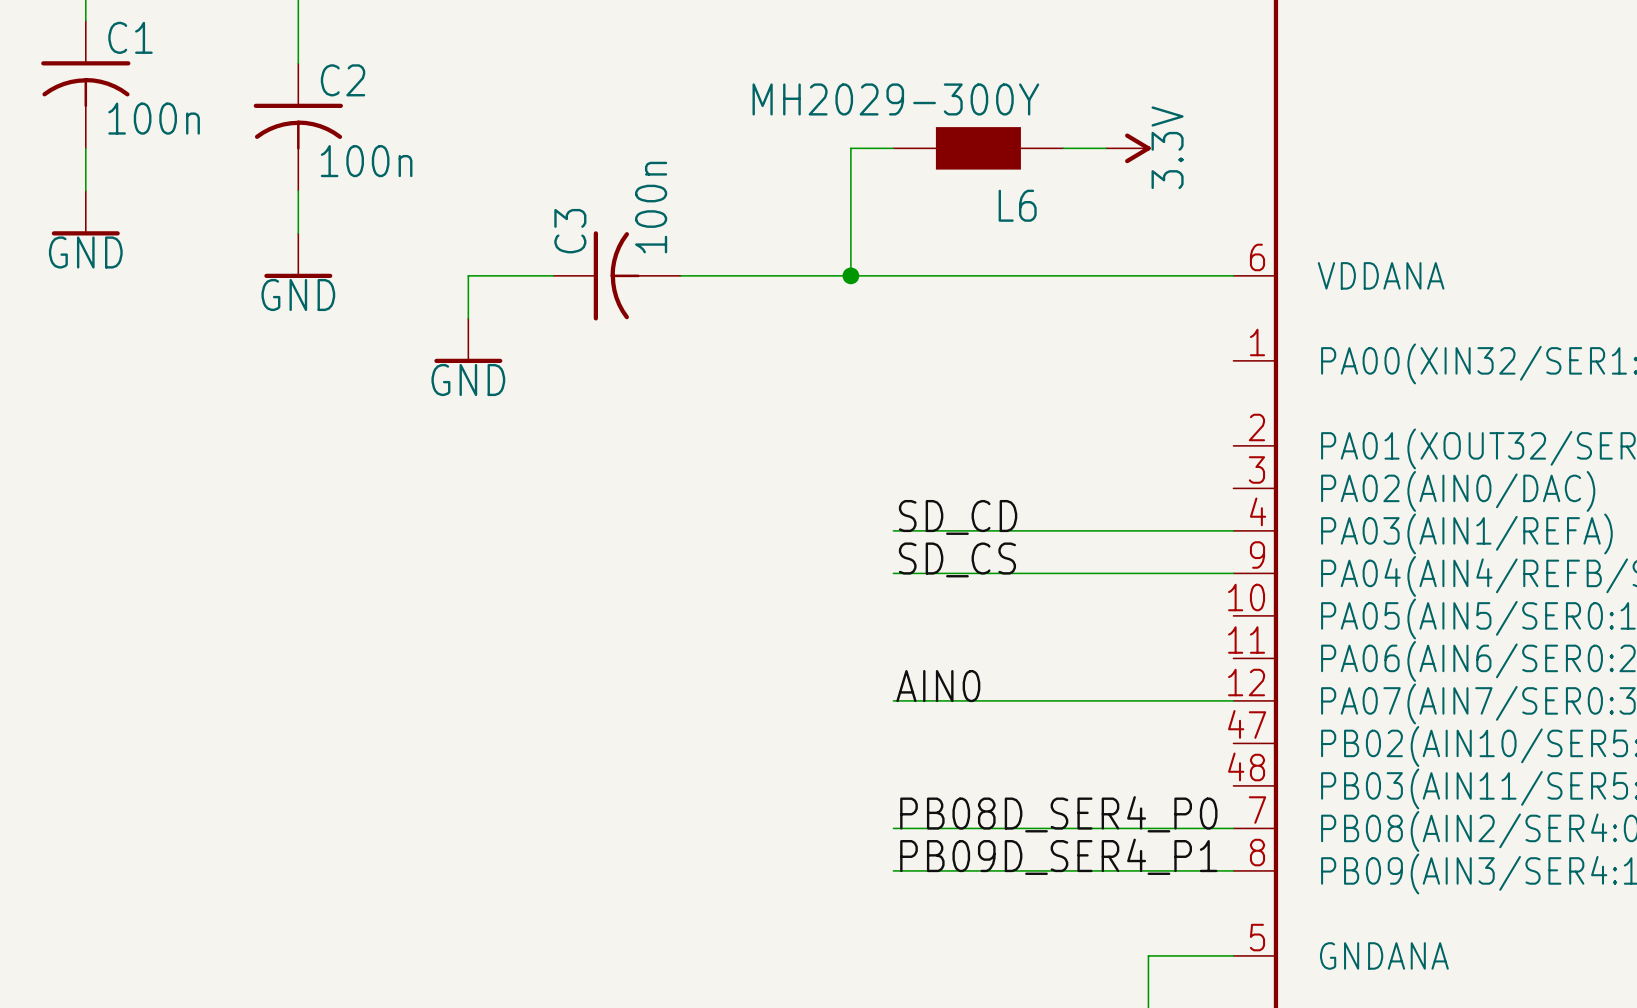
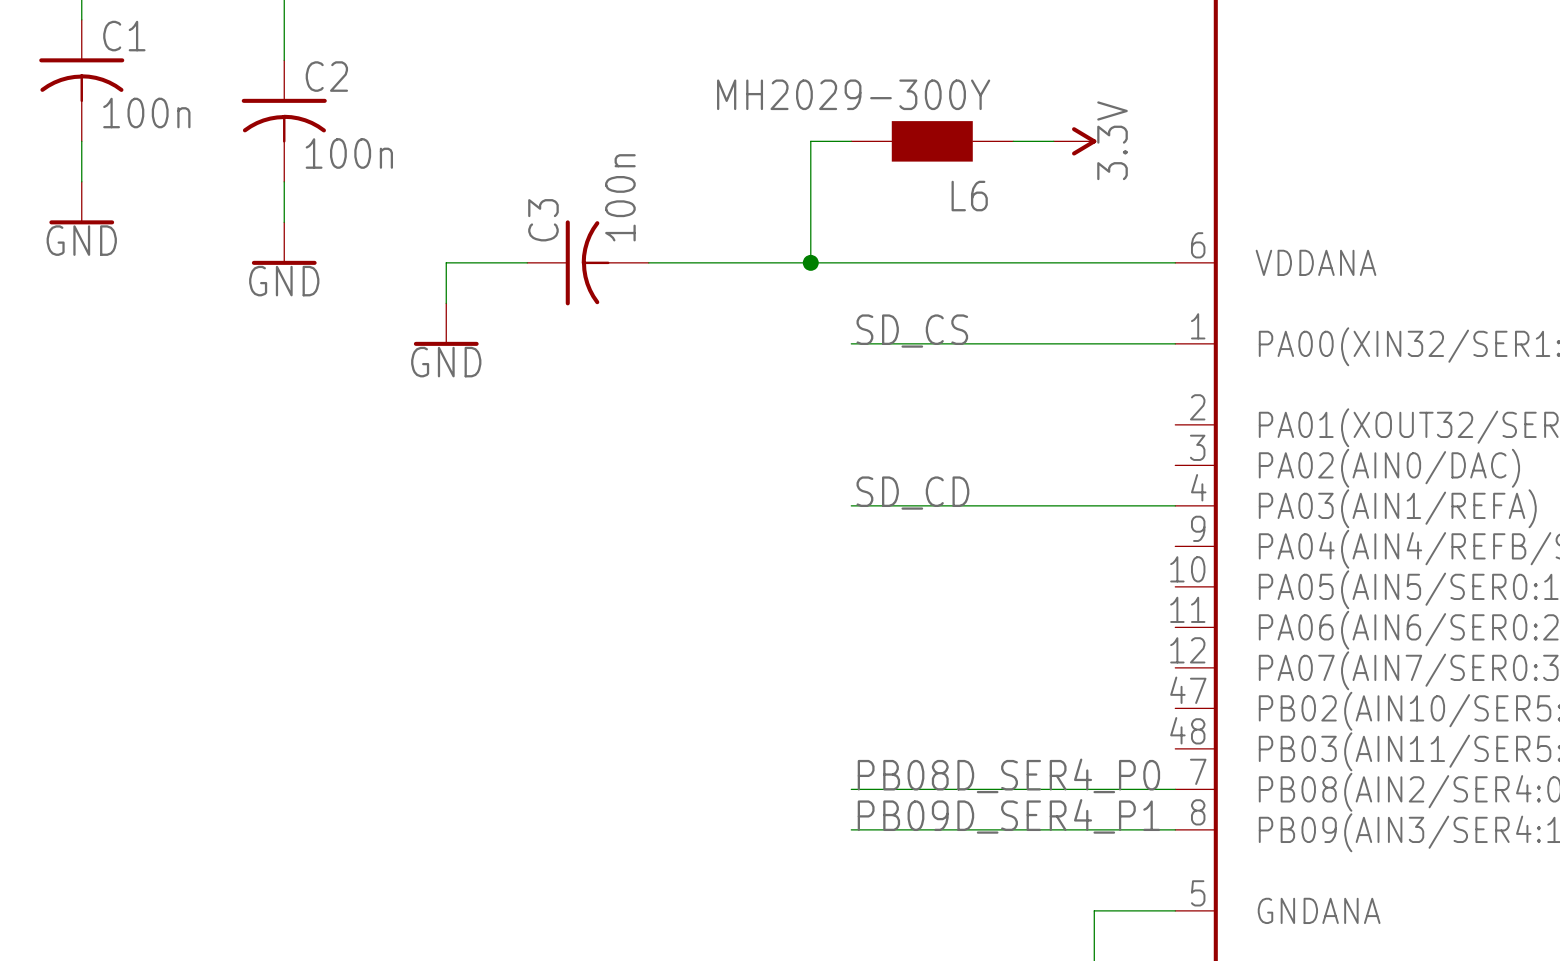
label position: SD_CS (957, 559) -> SD_CS (912, 331)
wire: (893, 573) (1233, 573) -> (851, 343) (1175, 343)
label: AIN0 (938, 686) -> none
wire: (893, 700) (1233, 700) -> none

